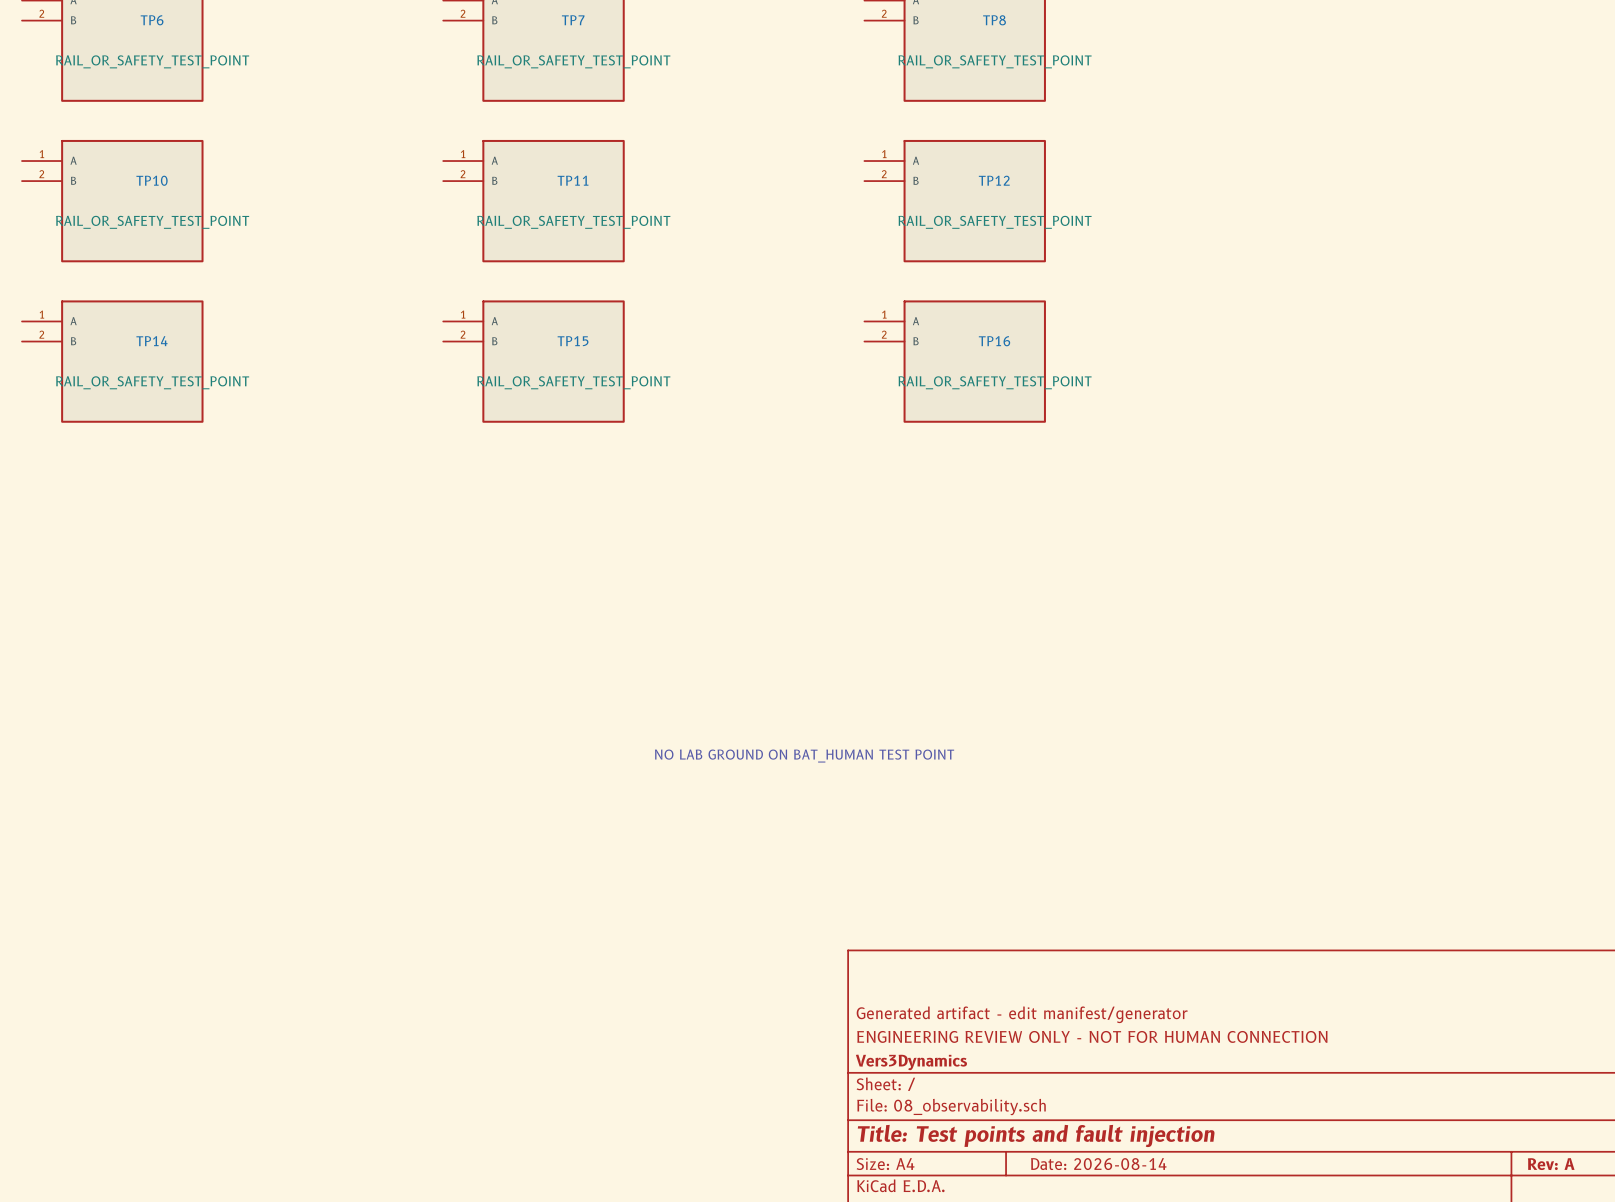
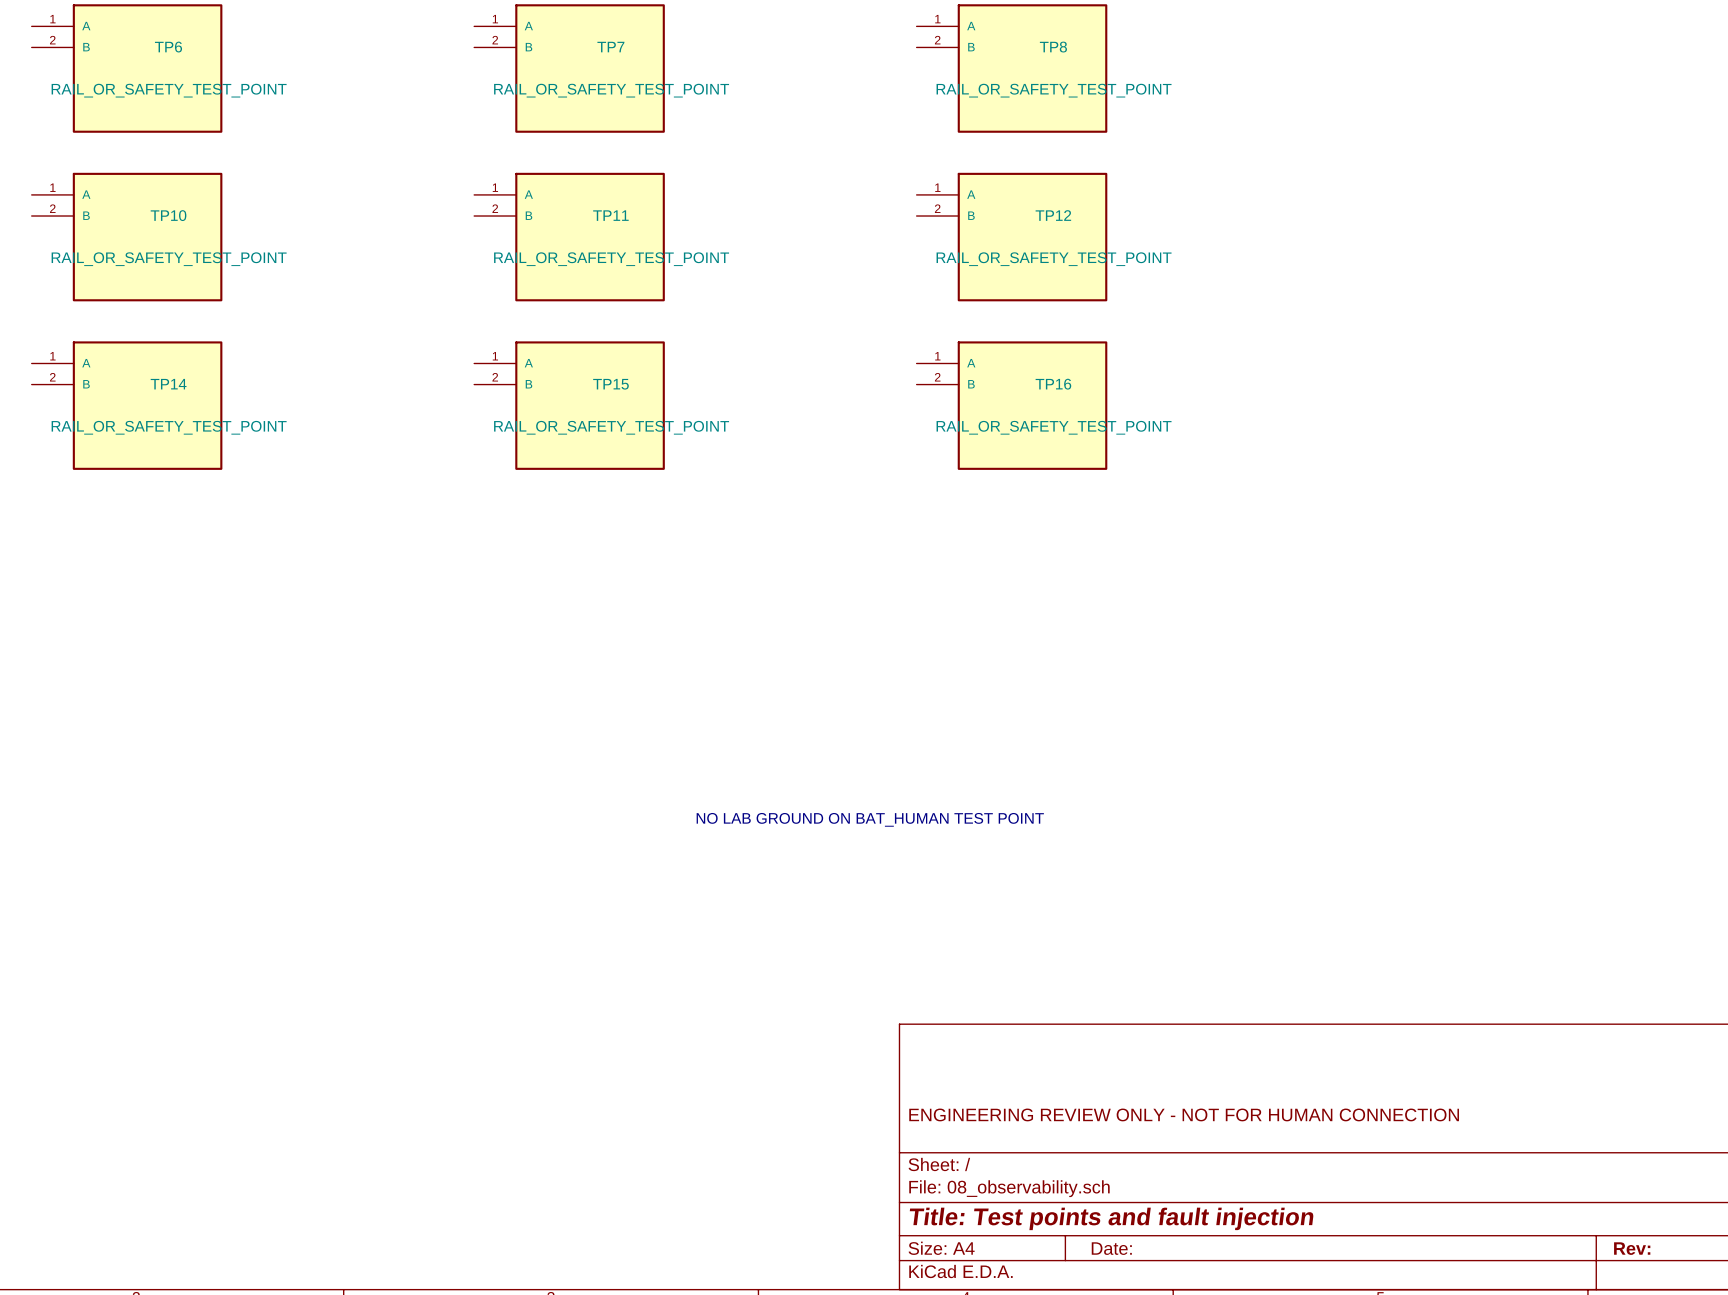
title block: Generated artifact - edit manifest/generator (1022, 1014) -> none
title block: Vers3Dynamics (911, 1062) -> none
title block: Date: 2026-08-14 (1098, 1164) -> Date: (1111, 1248)
title block: Rev: A (1551, 1164) -> Rev: (1632, 1248)

